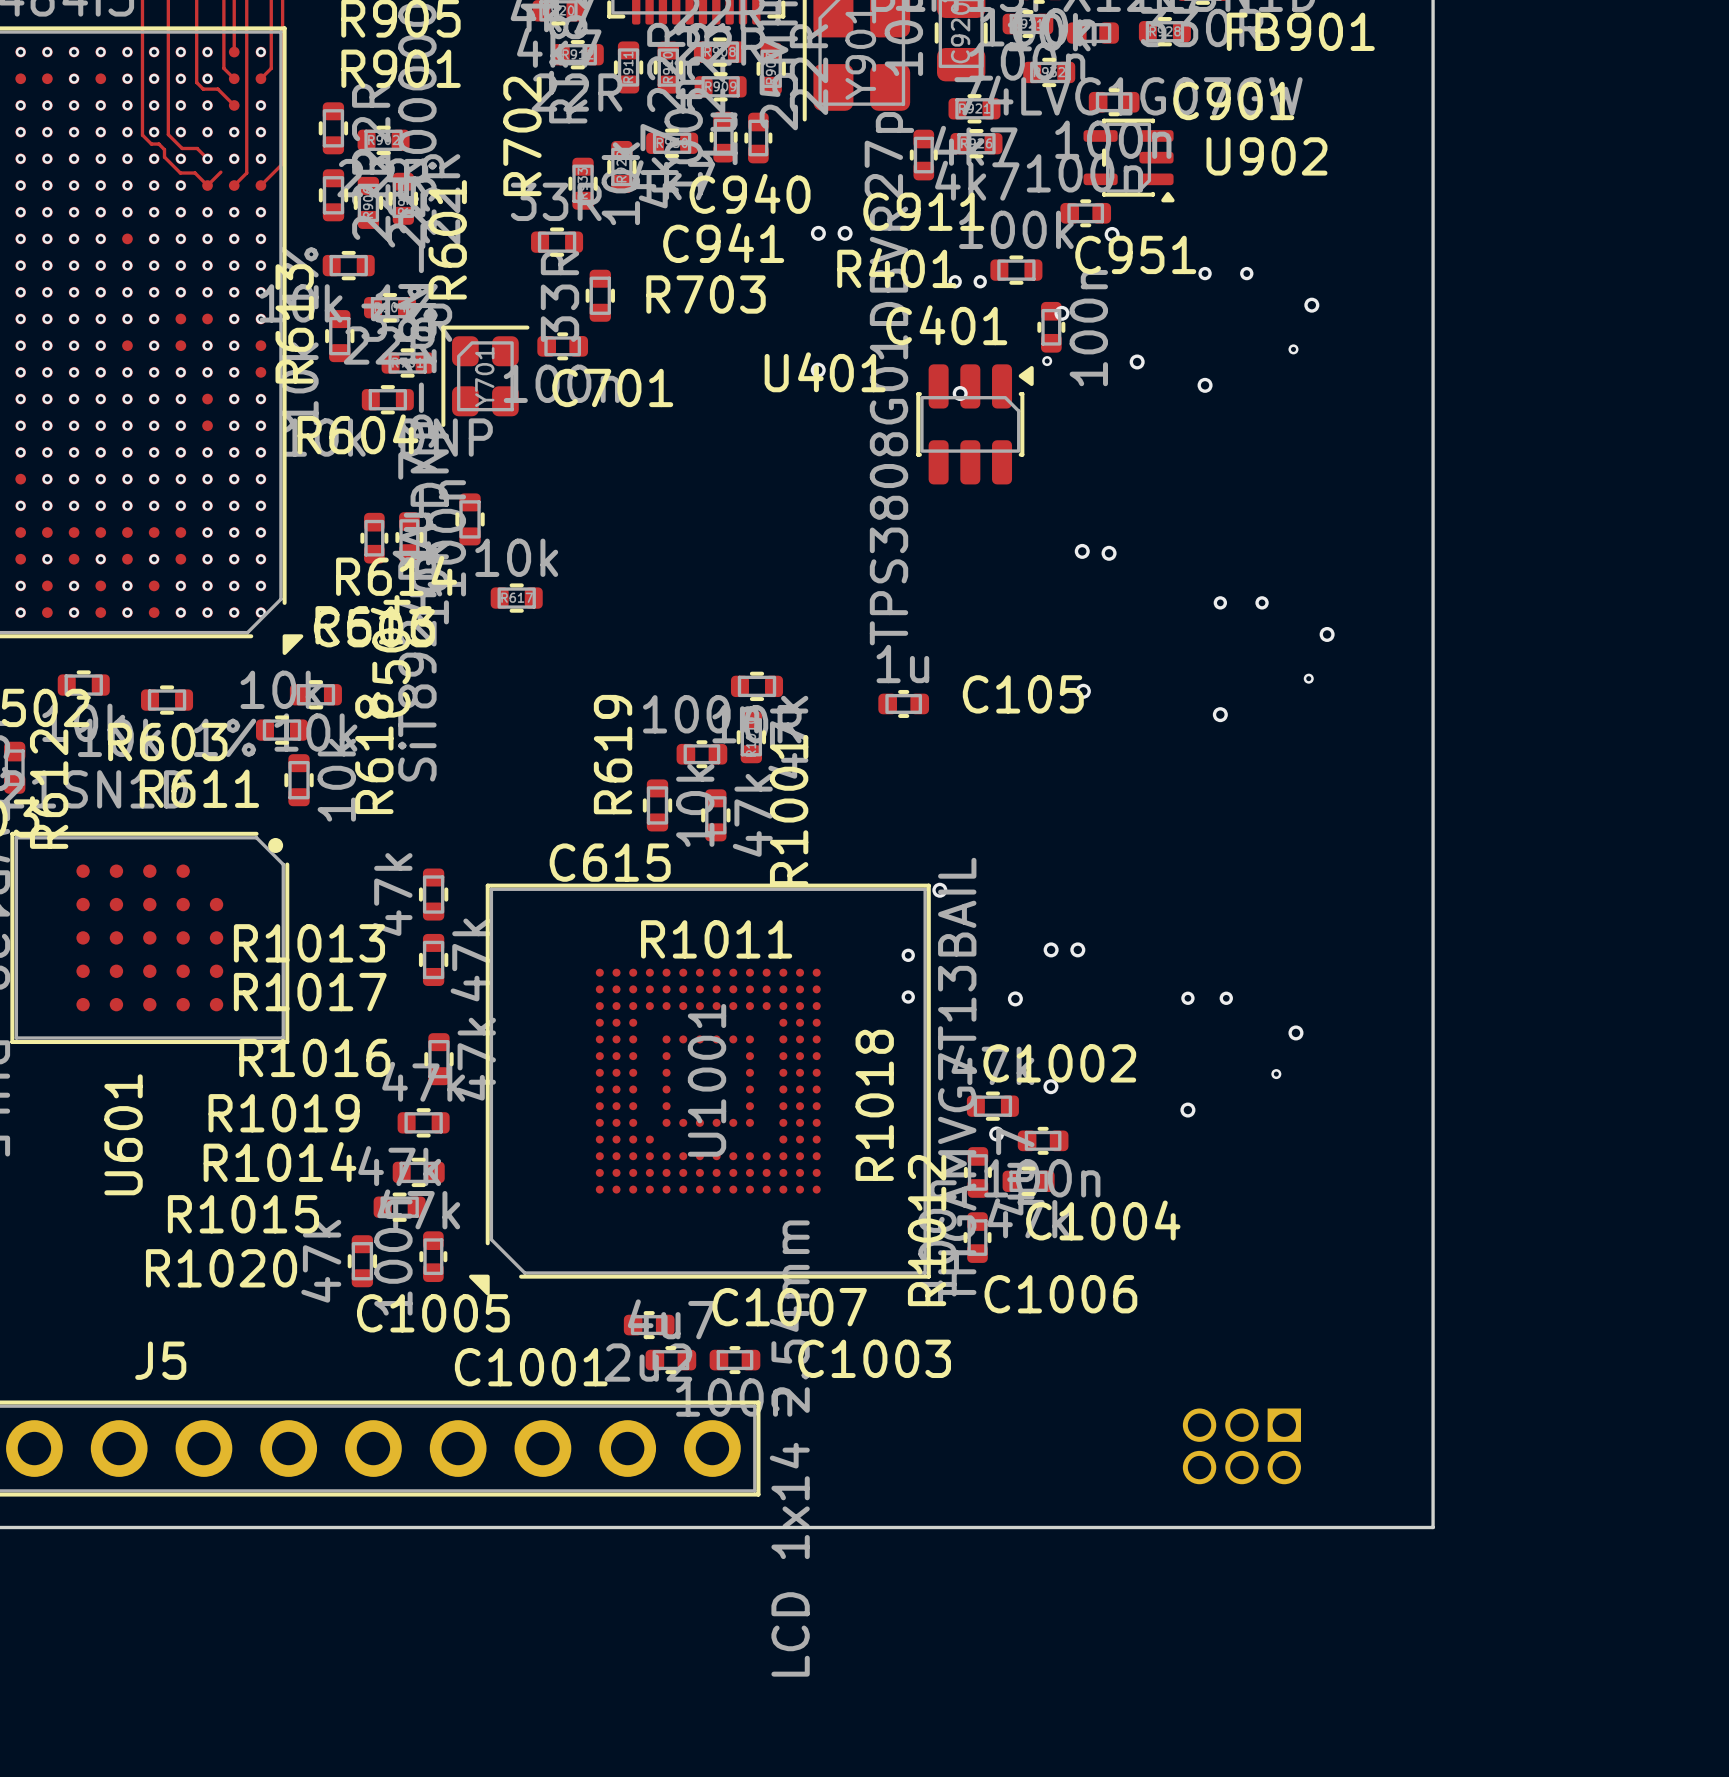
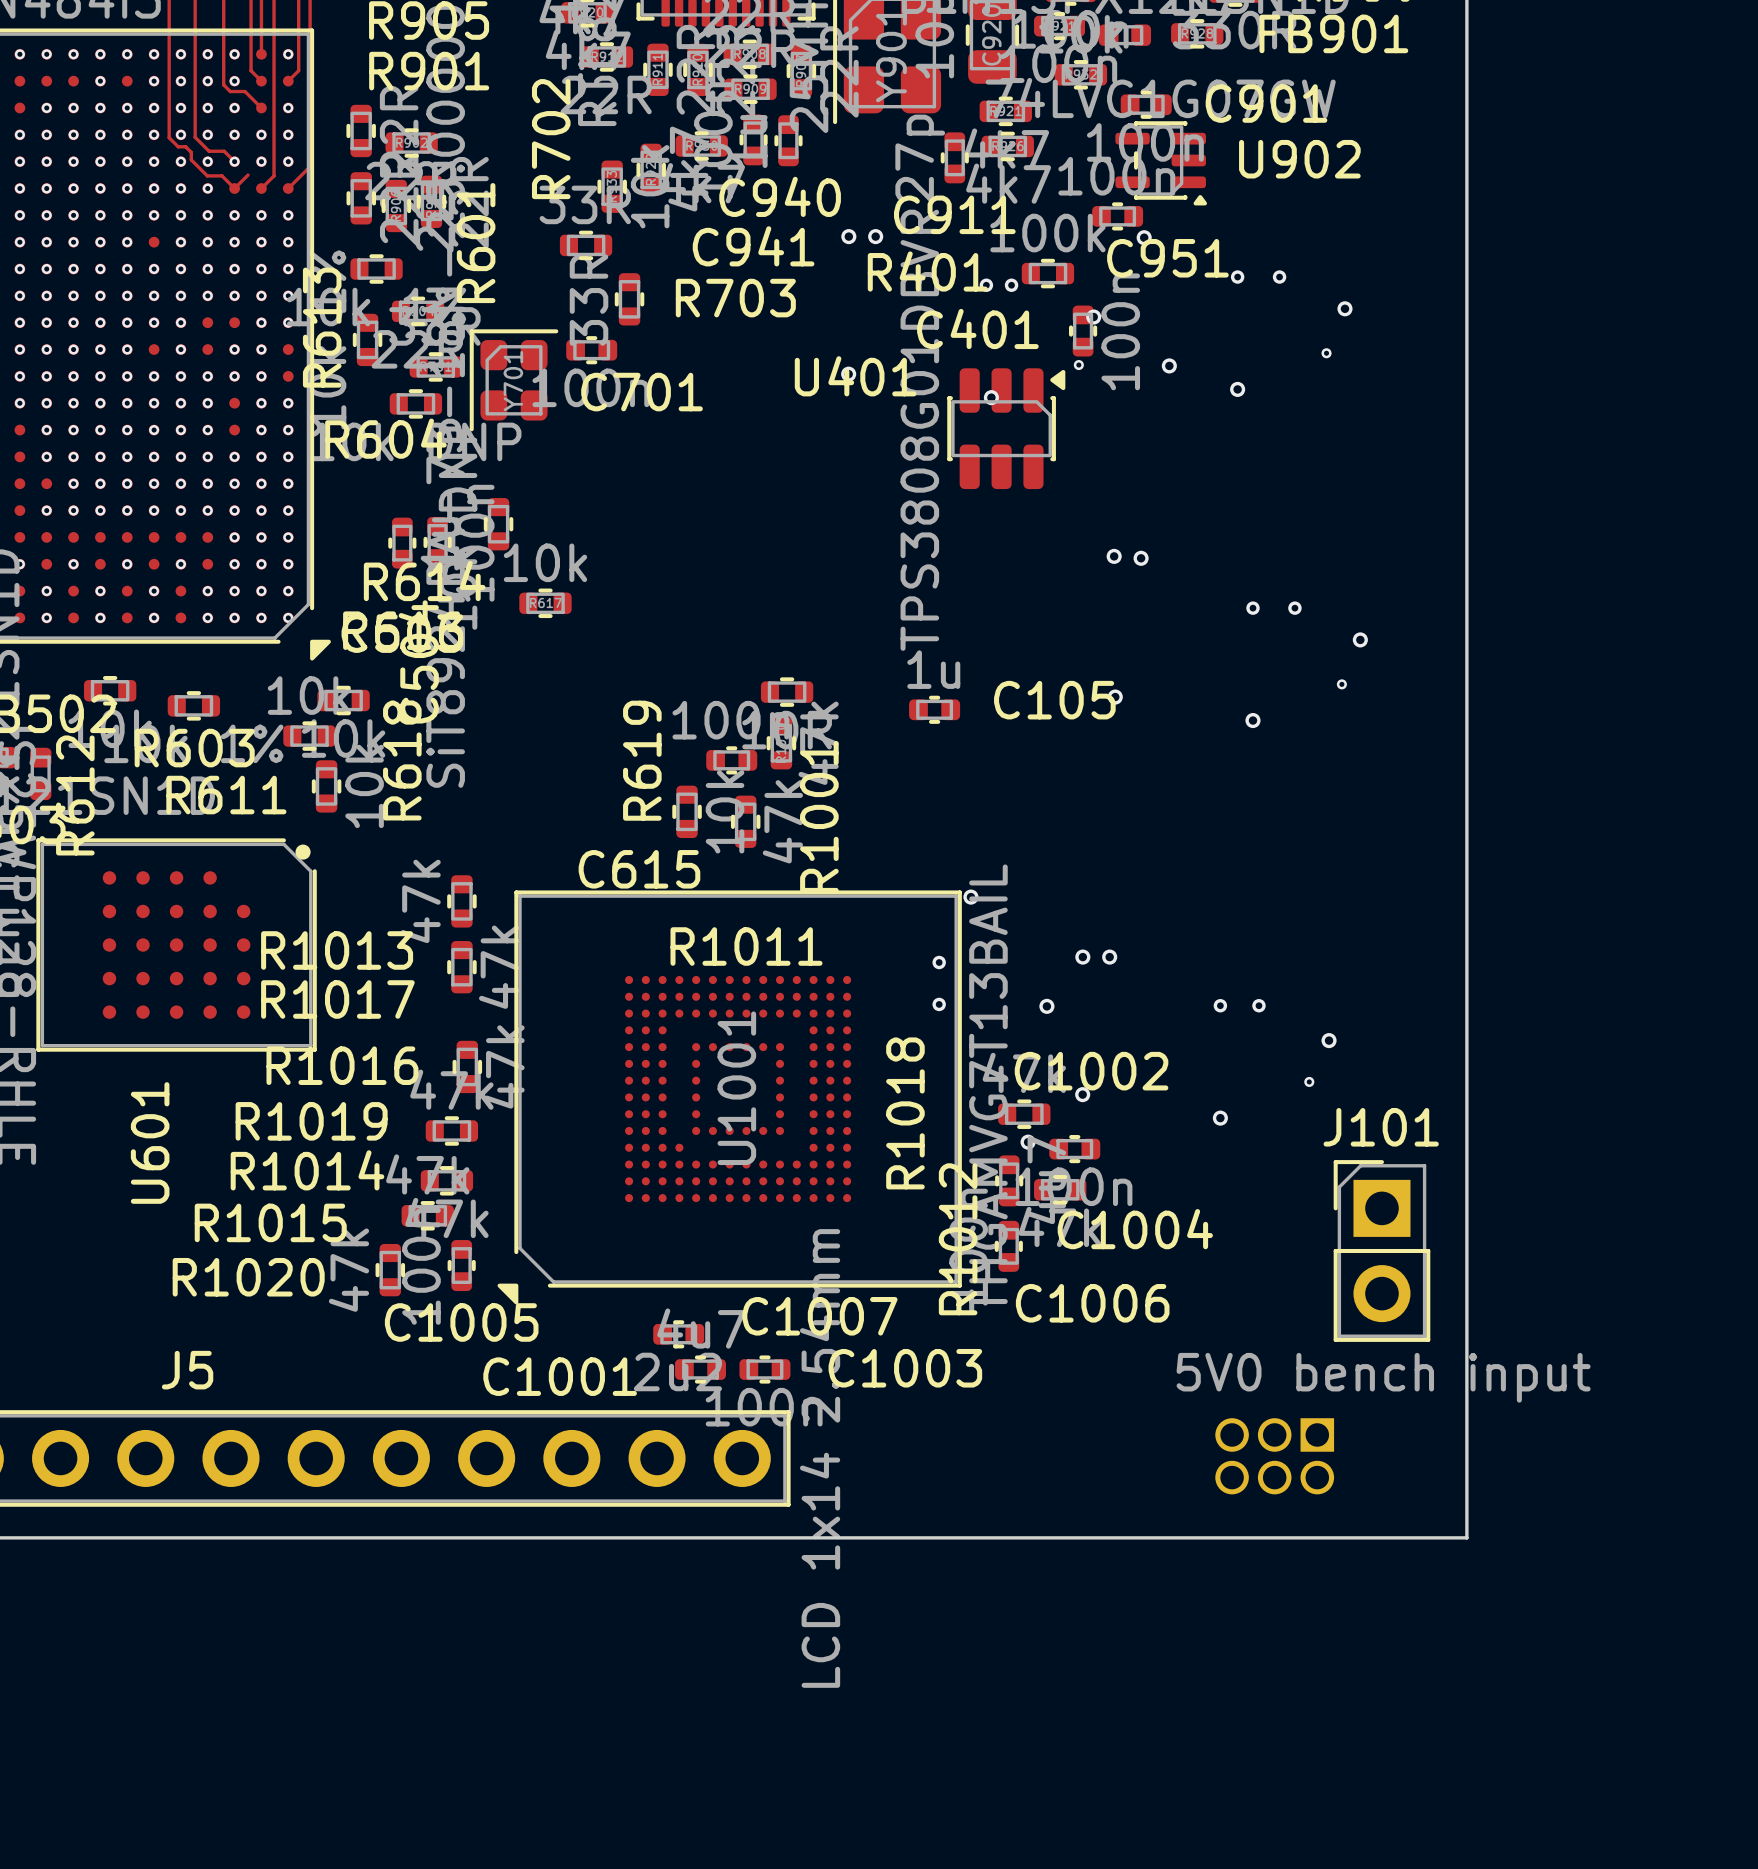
J101: none -> 5V0 bench input (1381, 1250)

